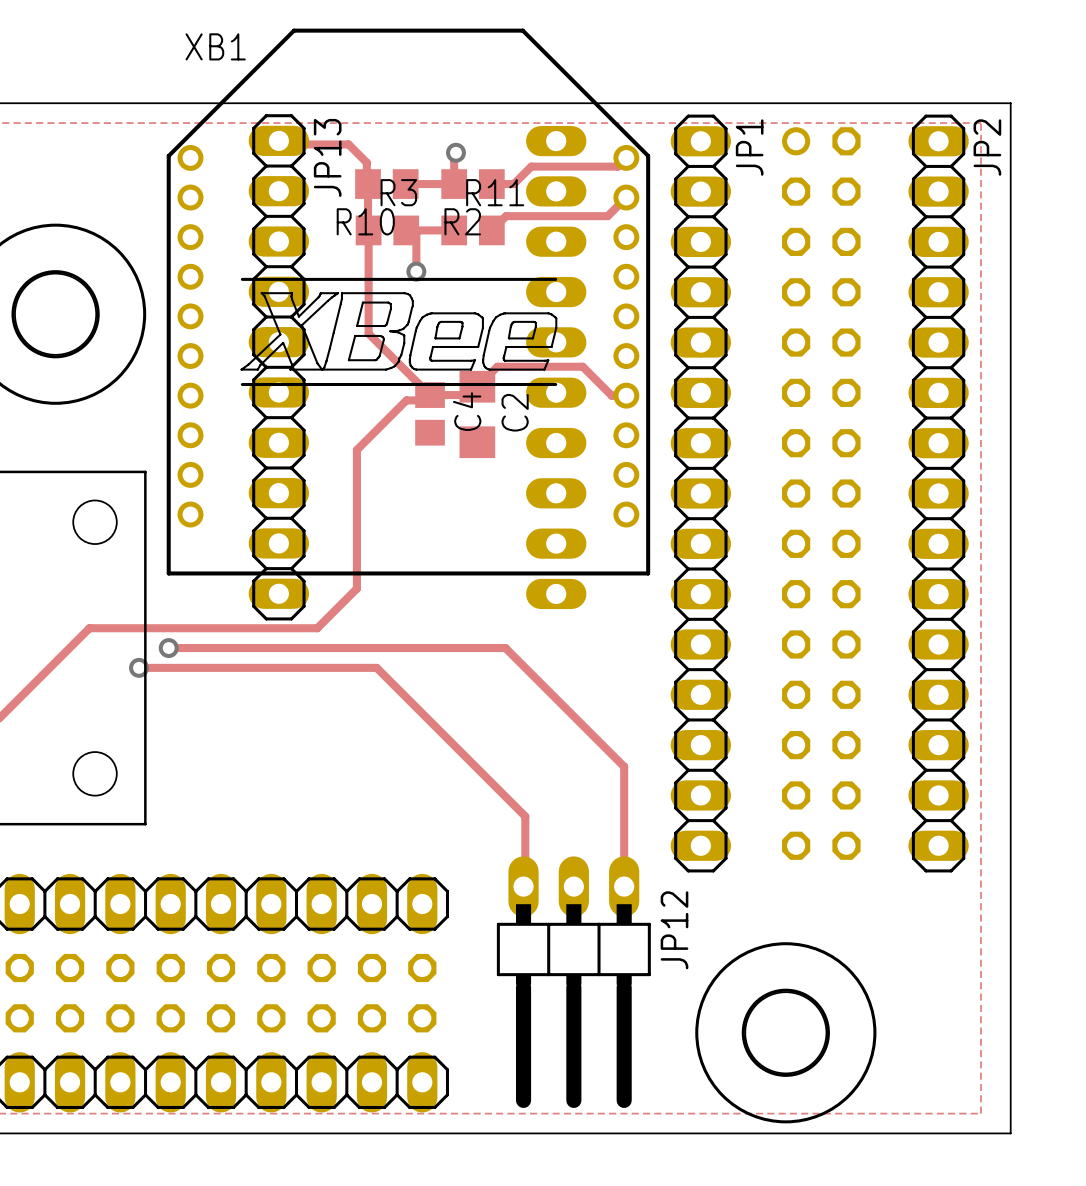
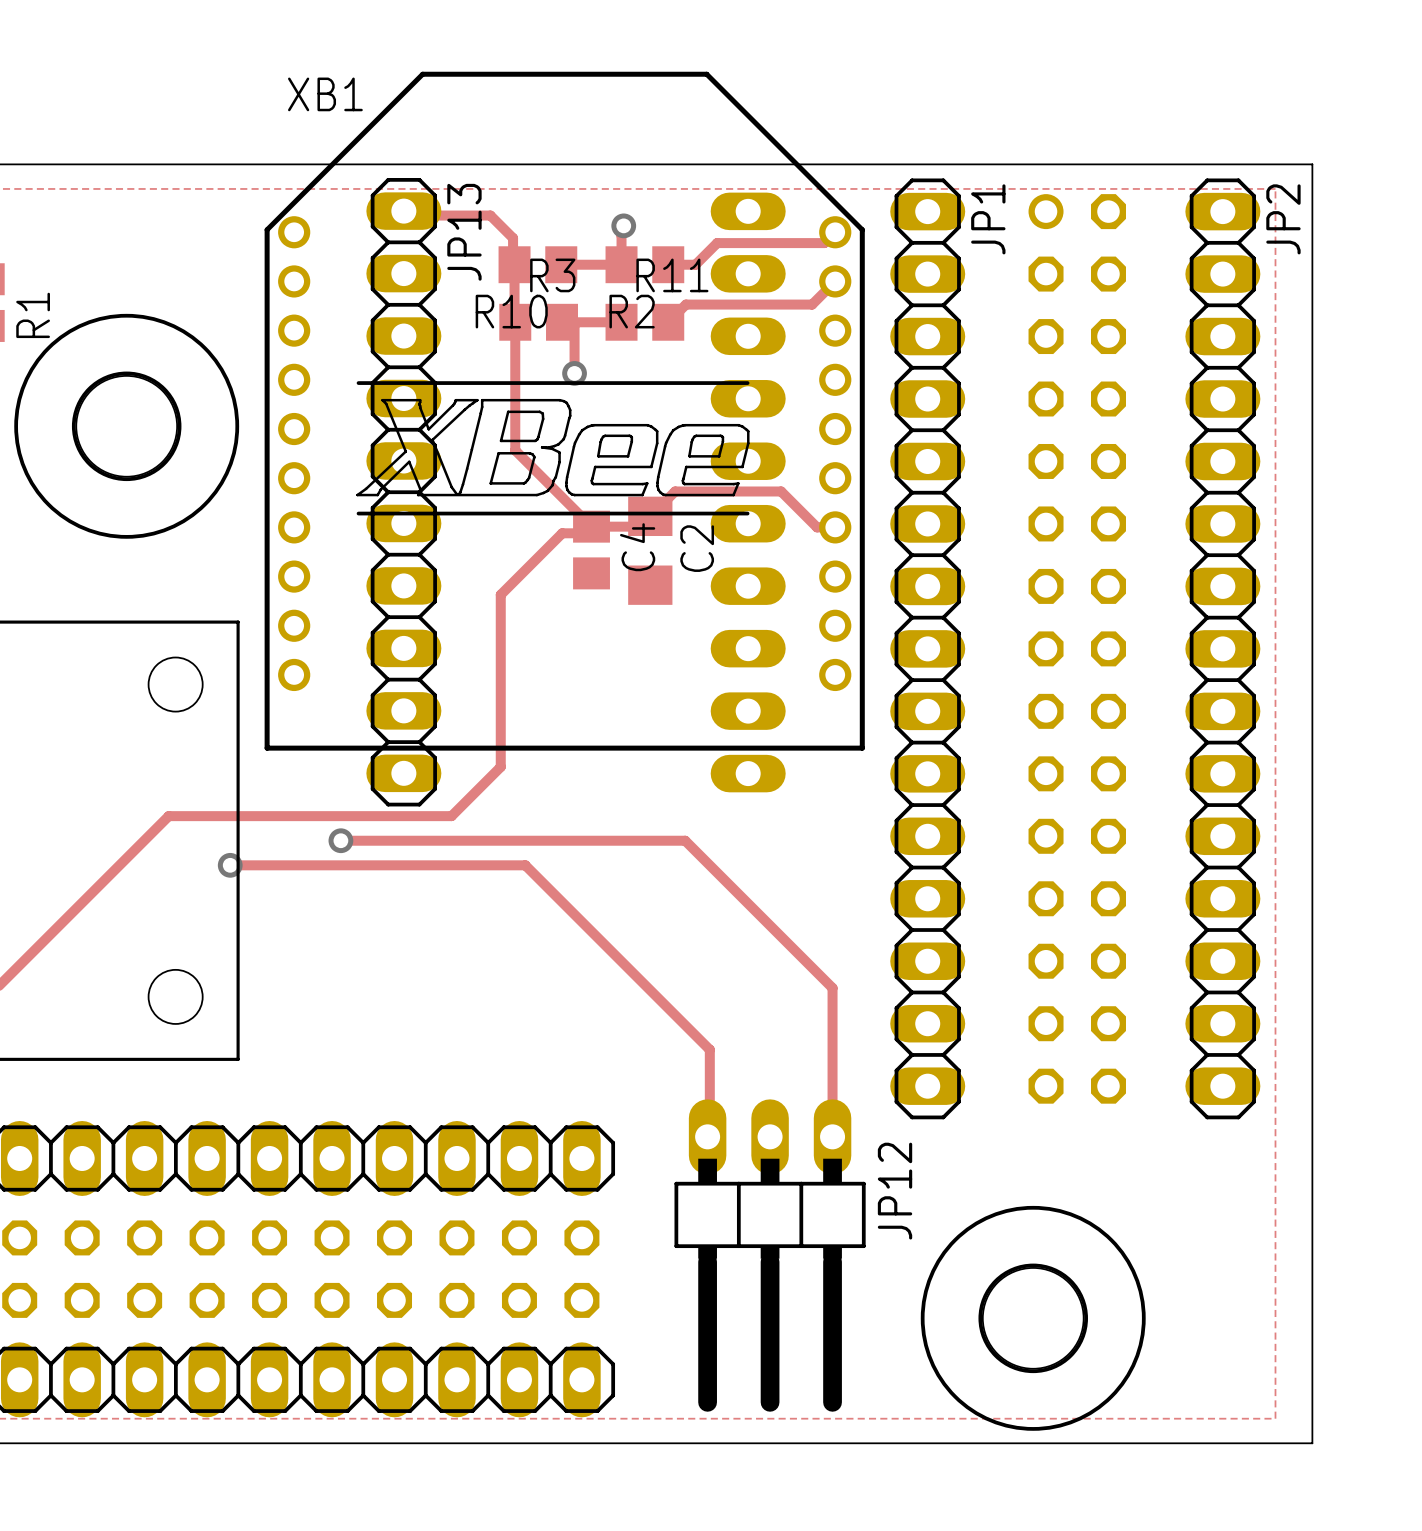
track: (168, 648) (228, 648) -> none
via position: (168, 648) -> (340, 840)

